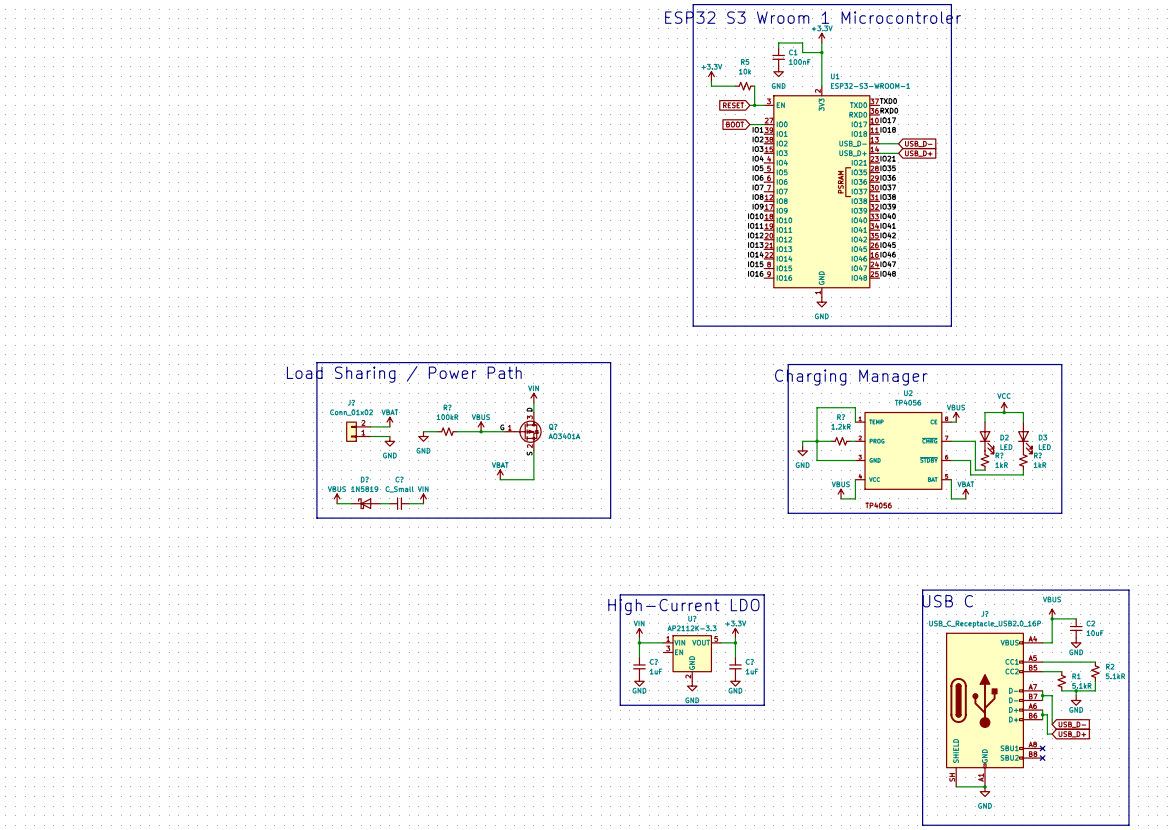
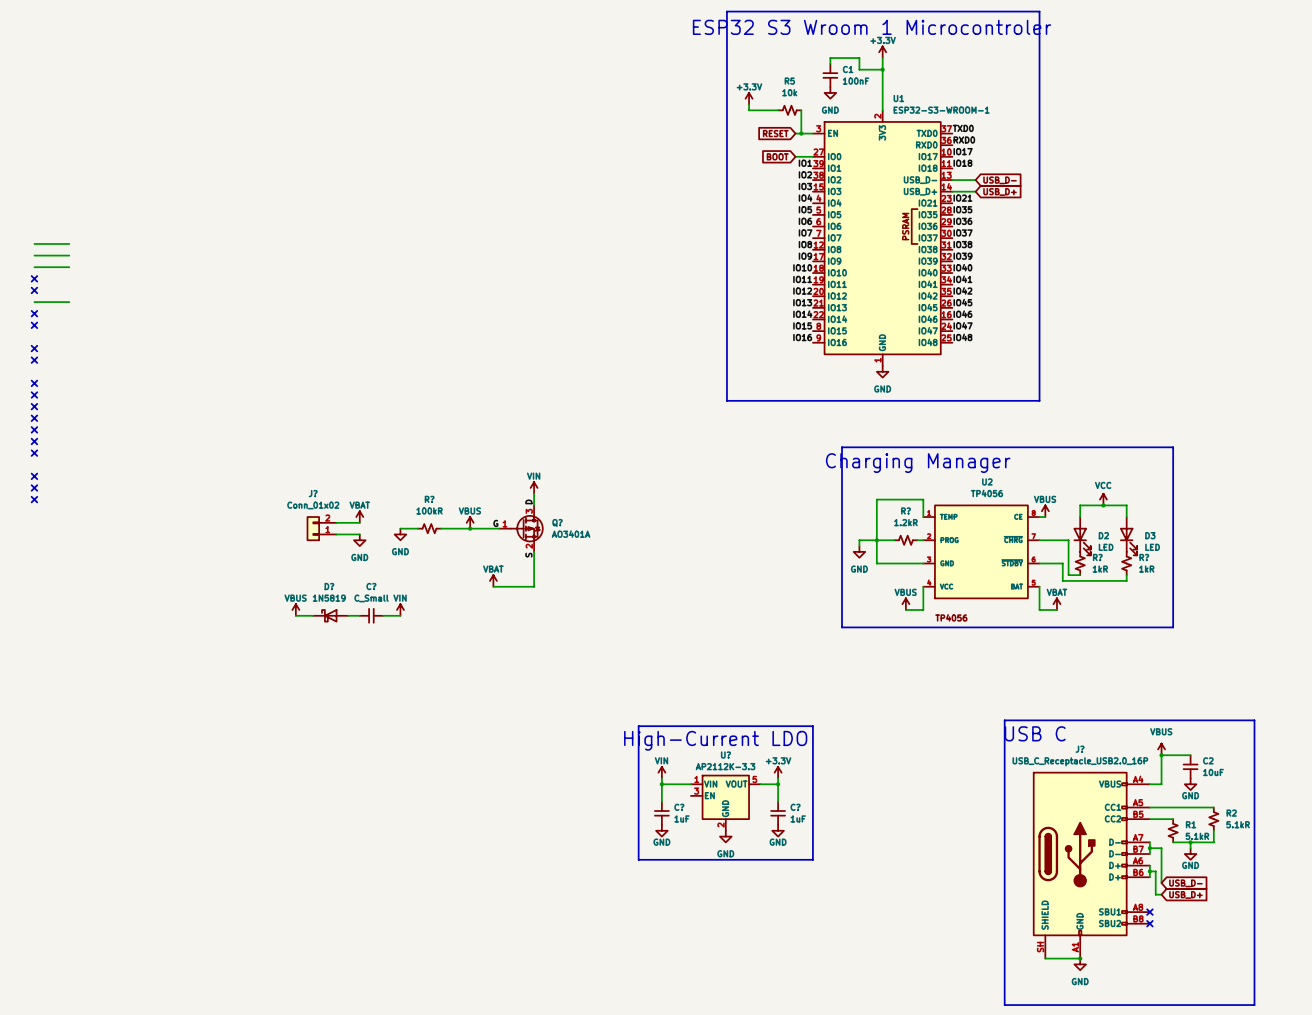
wire: none -> (34, 243) (69, 243)
wire: none -> (34, 255) (69, 255)
wire: none -> (34, 267) (69, 267)
no-connect mark: none -> (34, 278)
no-connect mark: none -> (34, 290)
wire: none -> (34, 302) (69, 302)
no-connect mark: none -> (34, 313)
no-connect mark: none -> (34, 325)
no-connect mark: none -> (34, 348)
no-connect mark: none -> (34, 360)
no-connect mark: none -> (34, 383)
no-connect mark: none -> (34, 395)
no-connect mark: none -> (34, 406)
no-connect mark: none -> (34, 418)
no-connect mark: none -> (34, 429)
no-connect mark: none -> (34, 441)
line: (316, 362) (610, 362) (610, 518) (316, 518) (316, 362) -> none
no-connect mark: none -> (34, 453)
text: Load Sharing / Power Path (404, 374) -> none
no-connect mark: none -> (34, 476)
no-connect mark: none -> (34, 487)
no-connect mark: none -> (34, 499)

